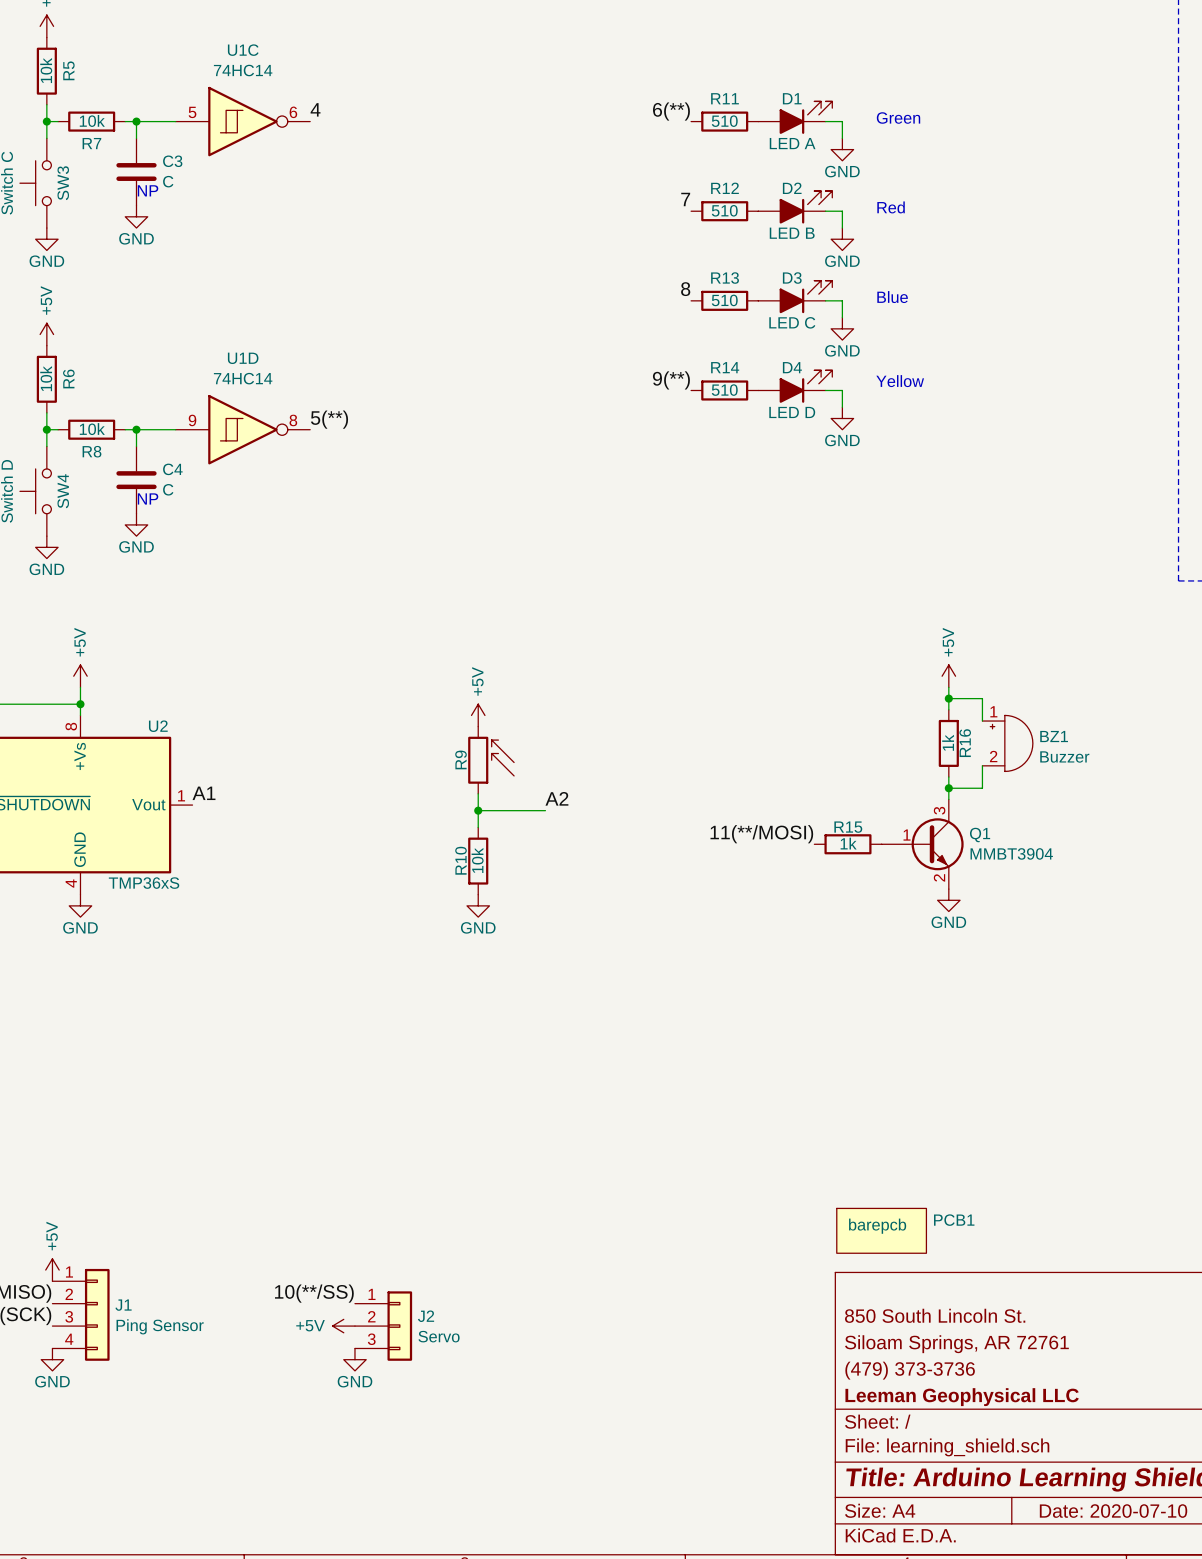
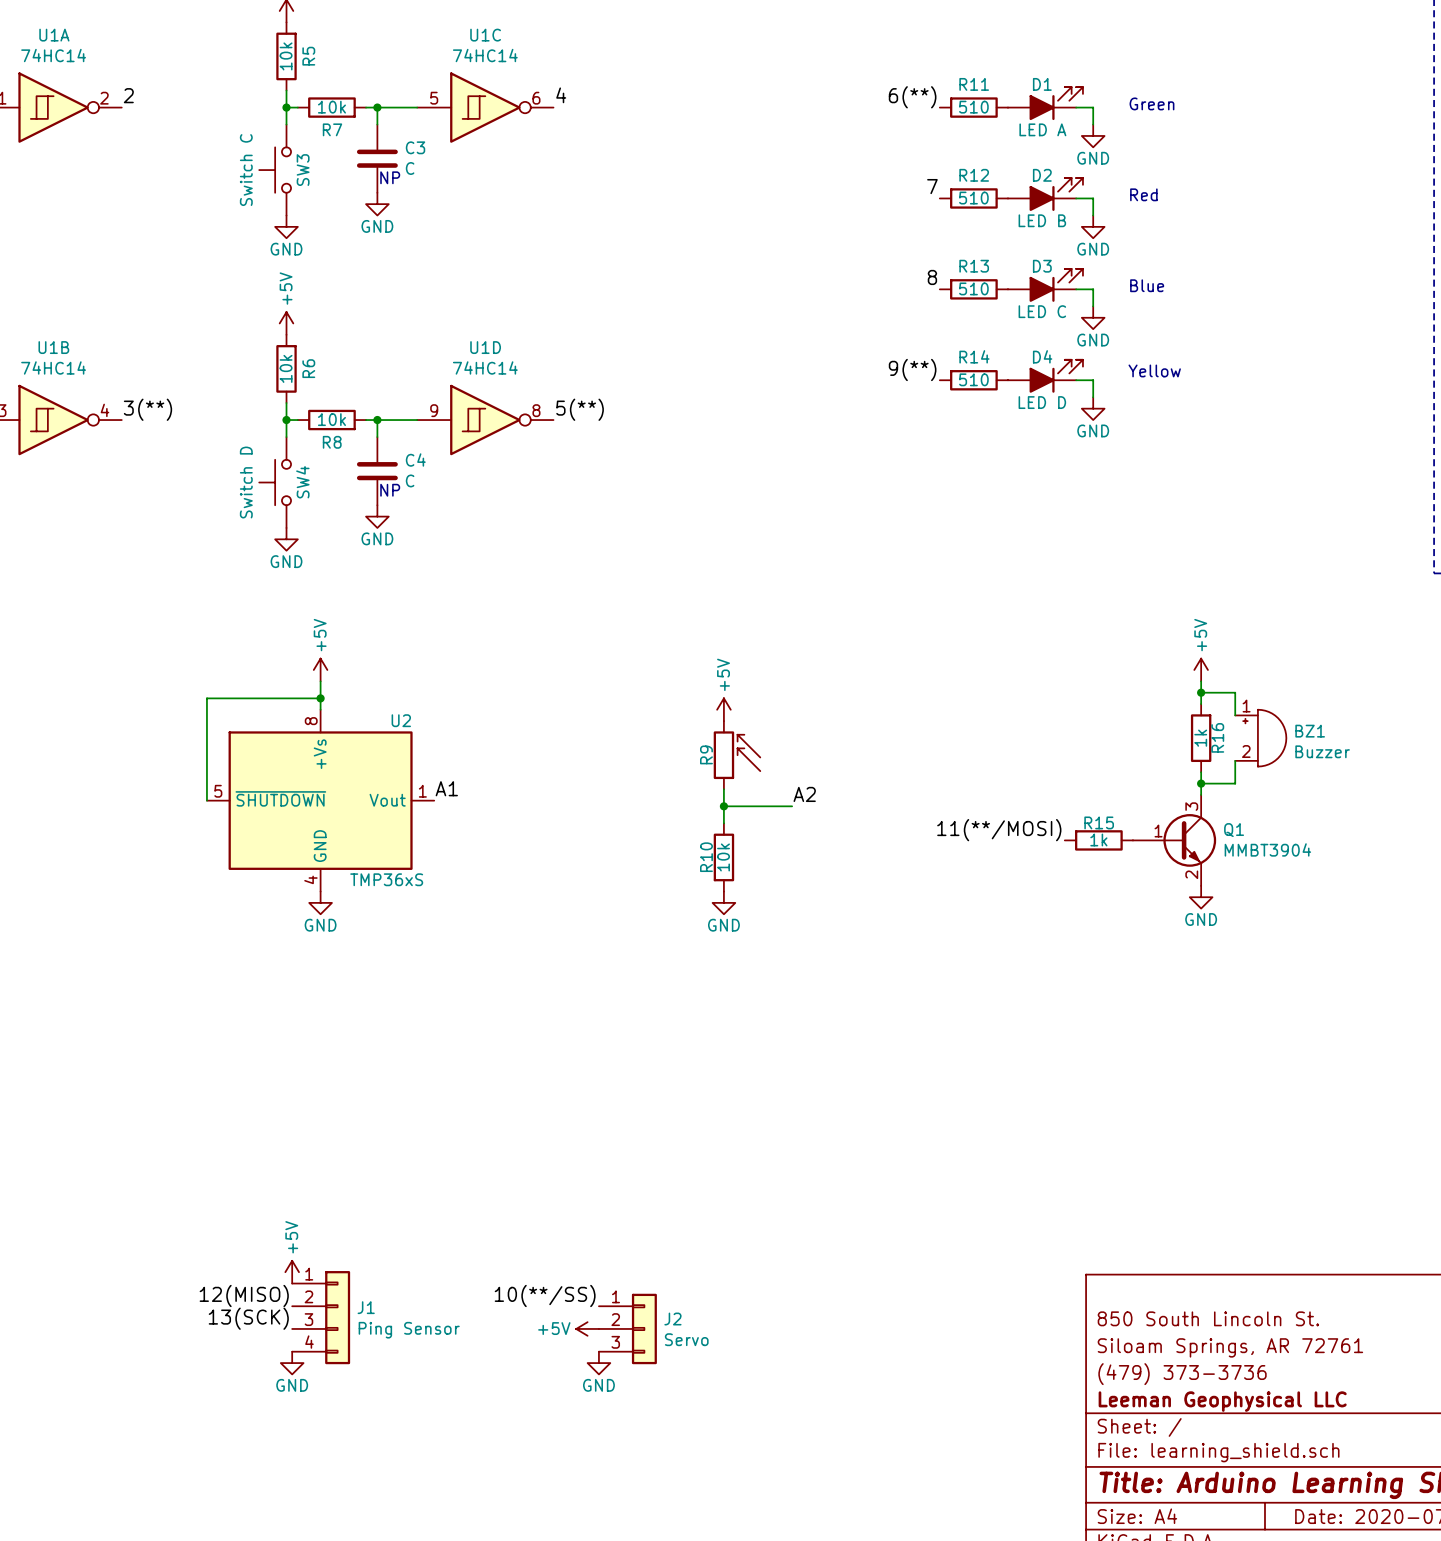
PCB1: barepcb (881, 1230) -> none

